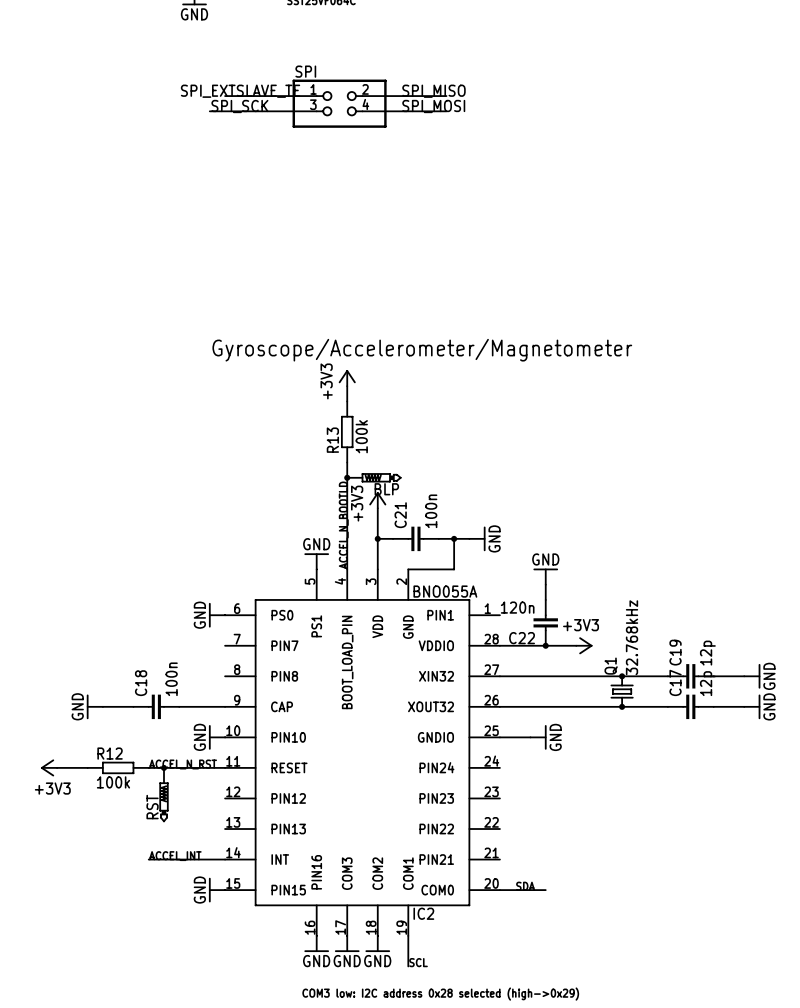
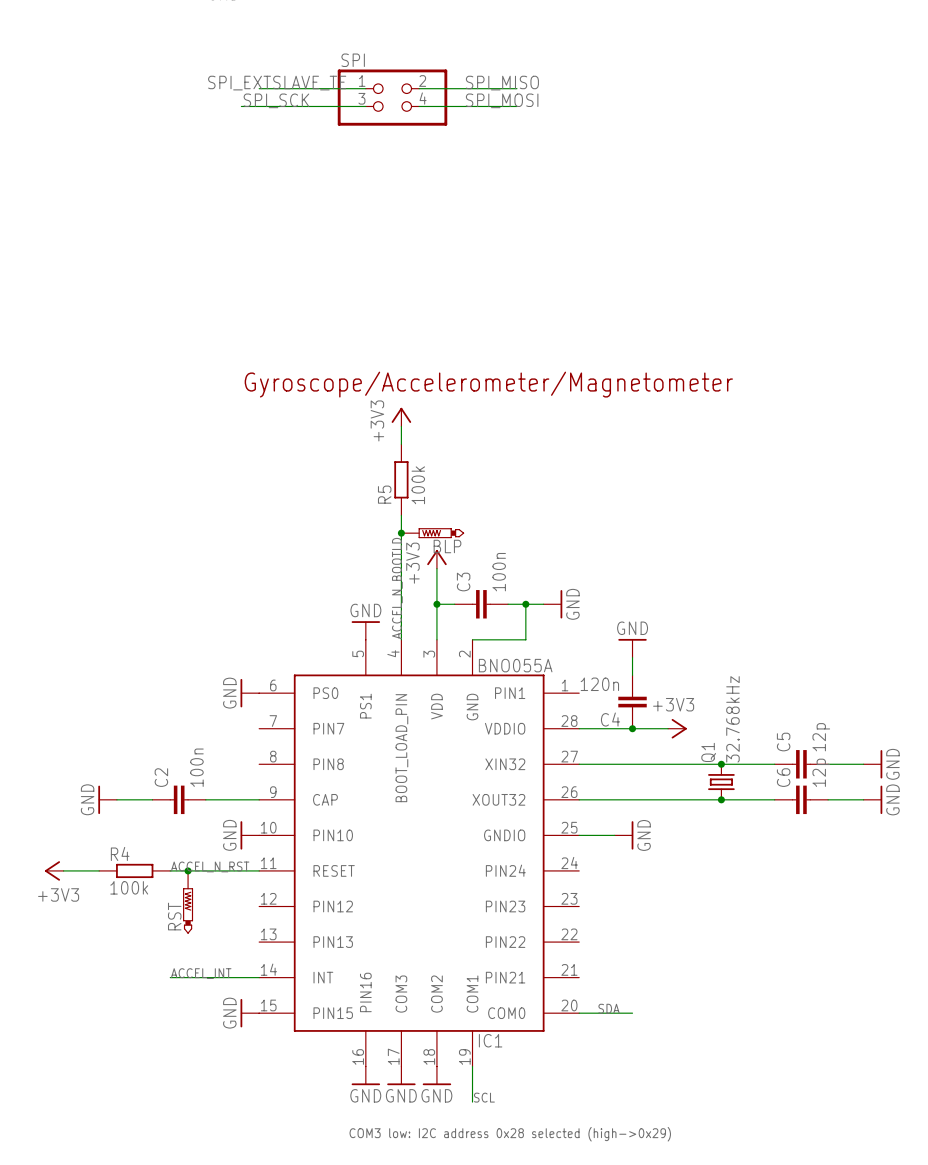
R13 name: R13 (332, 440) -> R5 (384, 494)
C21 name: C21 (400, 515) -> C3 (463, 582)
C22 name: C22 (522, 638) -> C4 (610, 719)
C19 name: C19 (675, 652) -> C5 (783, 742)
C17 name: C17 (675, 682) -> C6 (783, 777)
C18 name: C18 (141, 683) -> C2 (161, 777)
R12 name: R12 (110, 753) -> R4 (120, 853)
IC2 name: IC2 (423, 913) -> IC1 (490, 1040)

